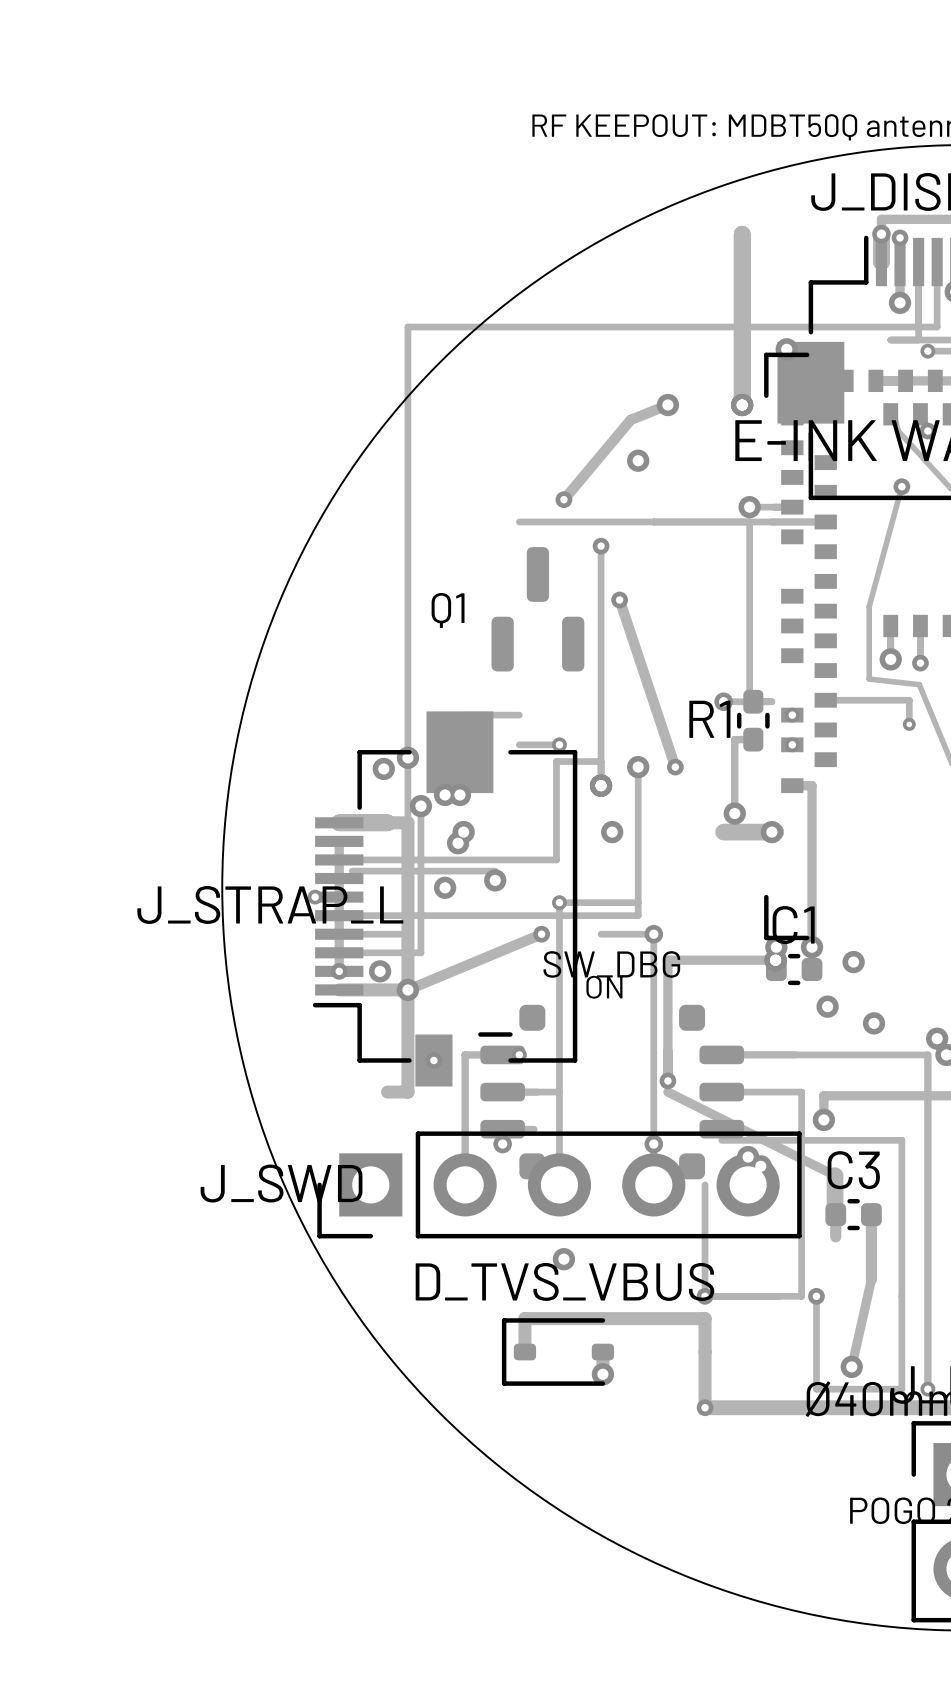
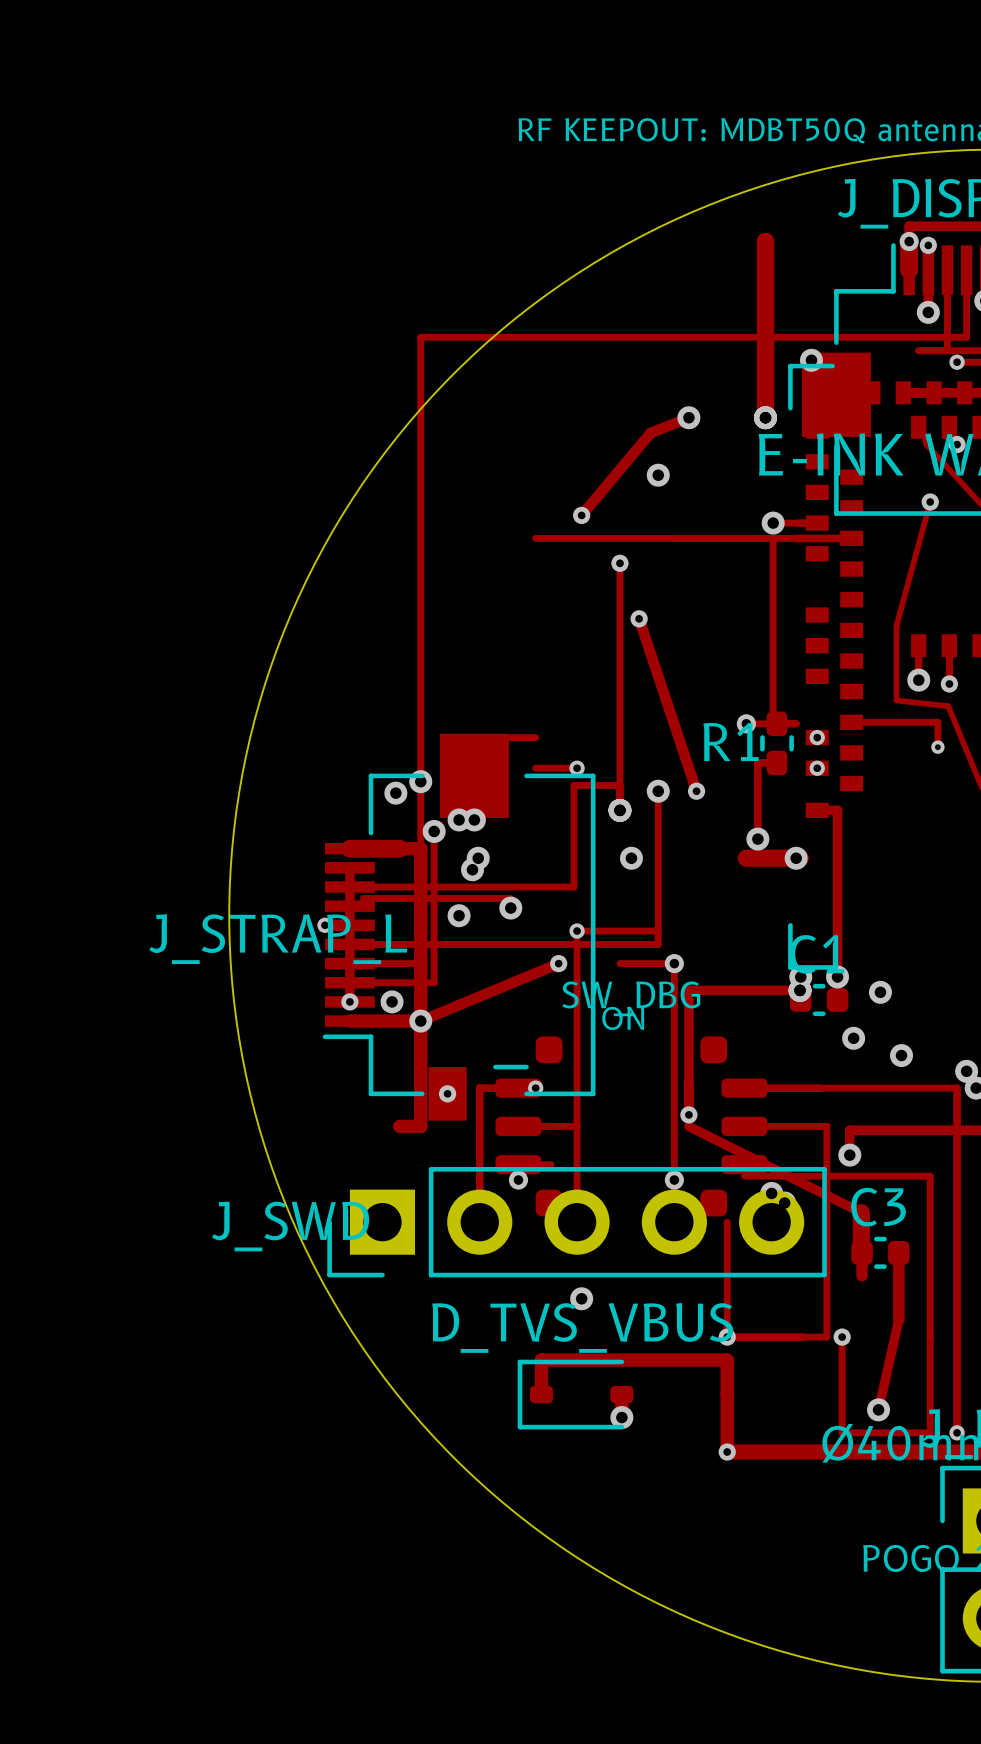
Q1: (537, 609) -> none

